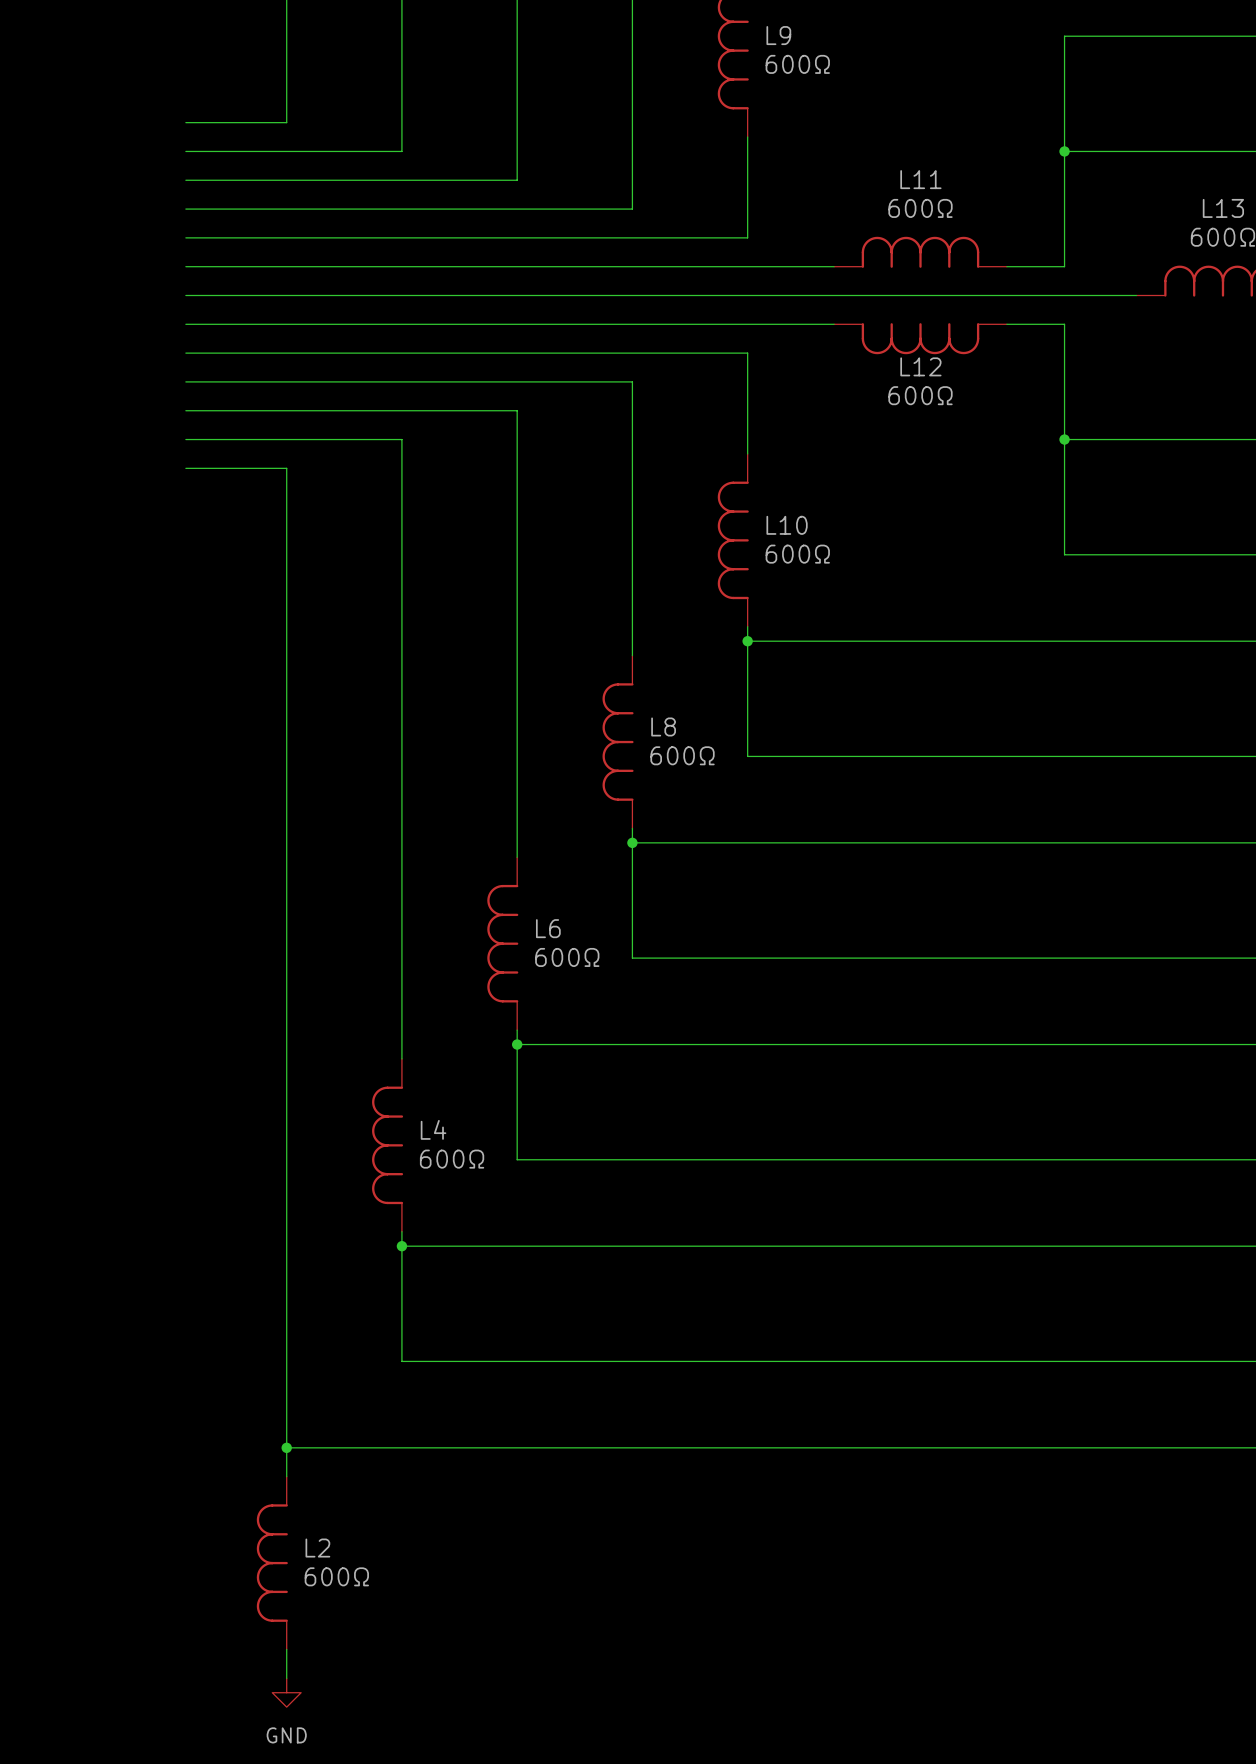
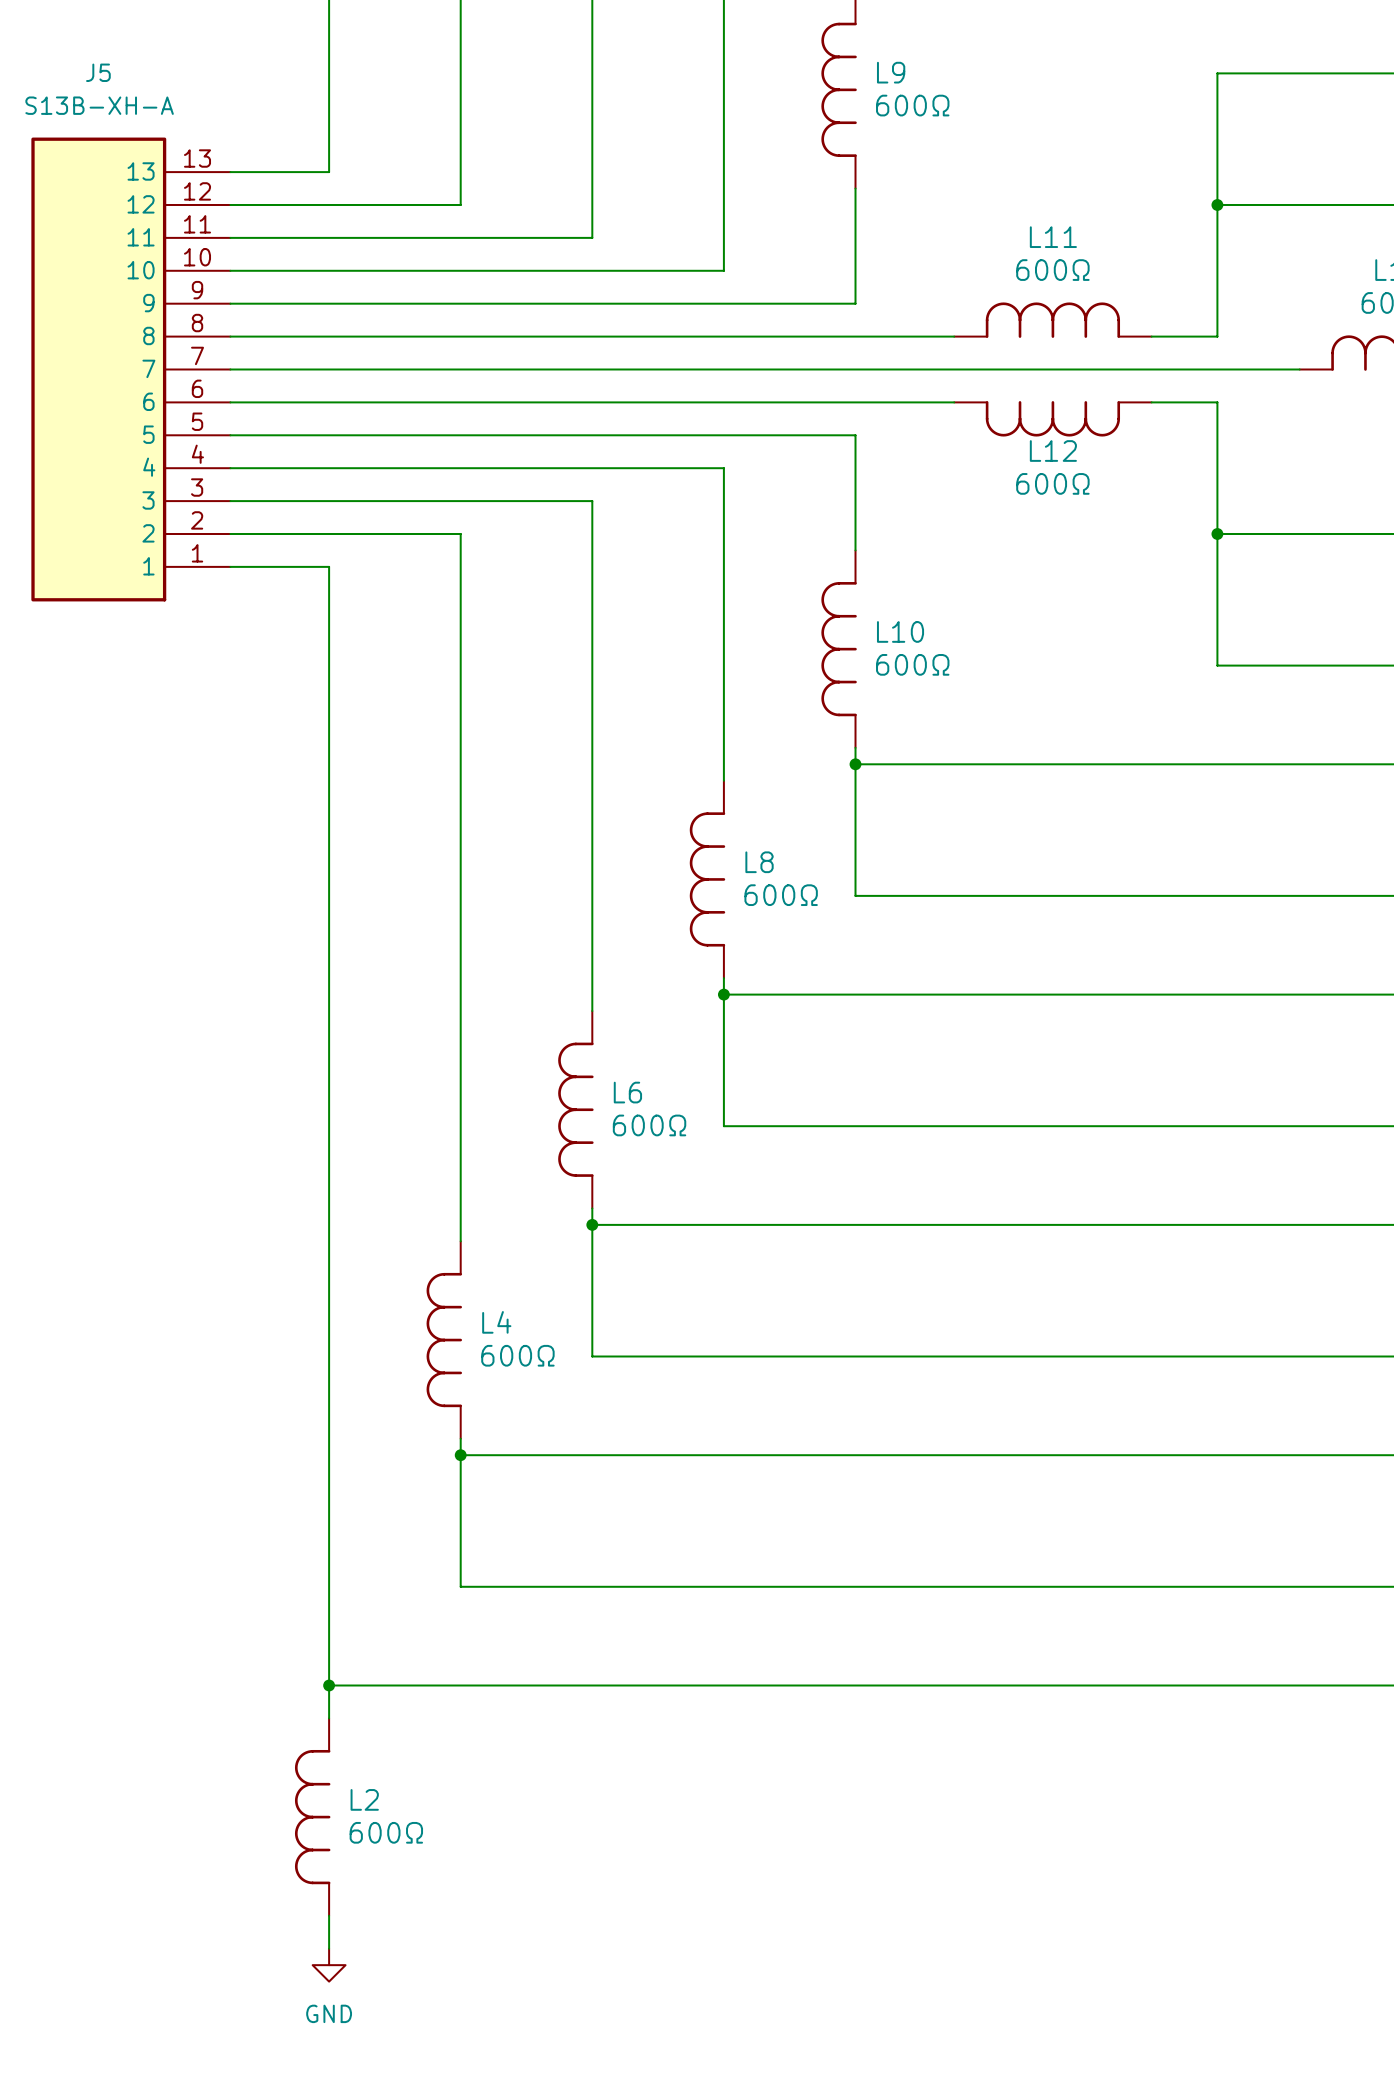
J5: none -> S13B-XH-A (130, 369)

